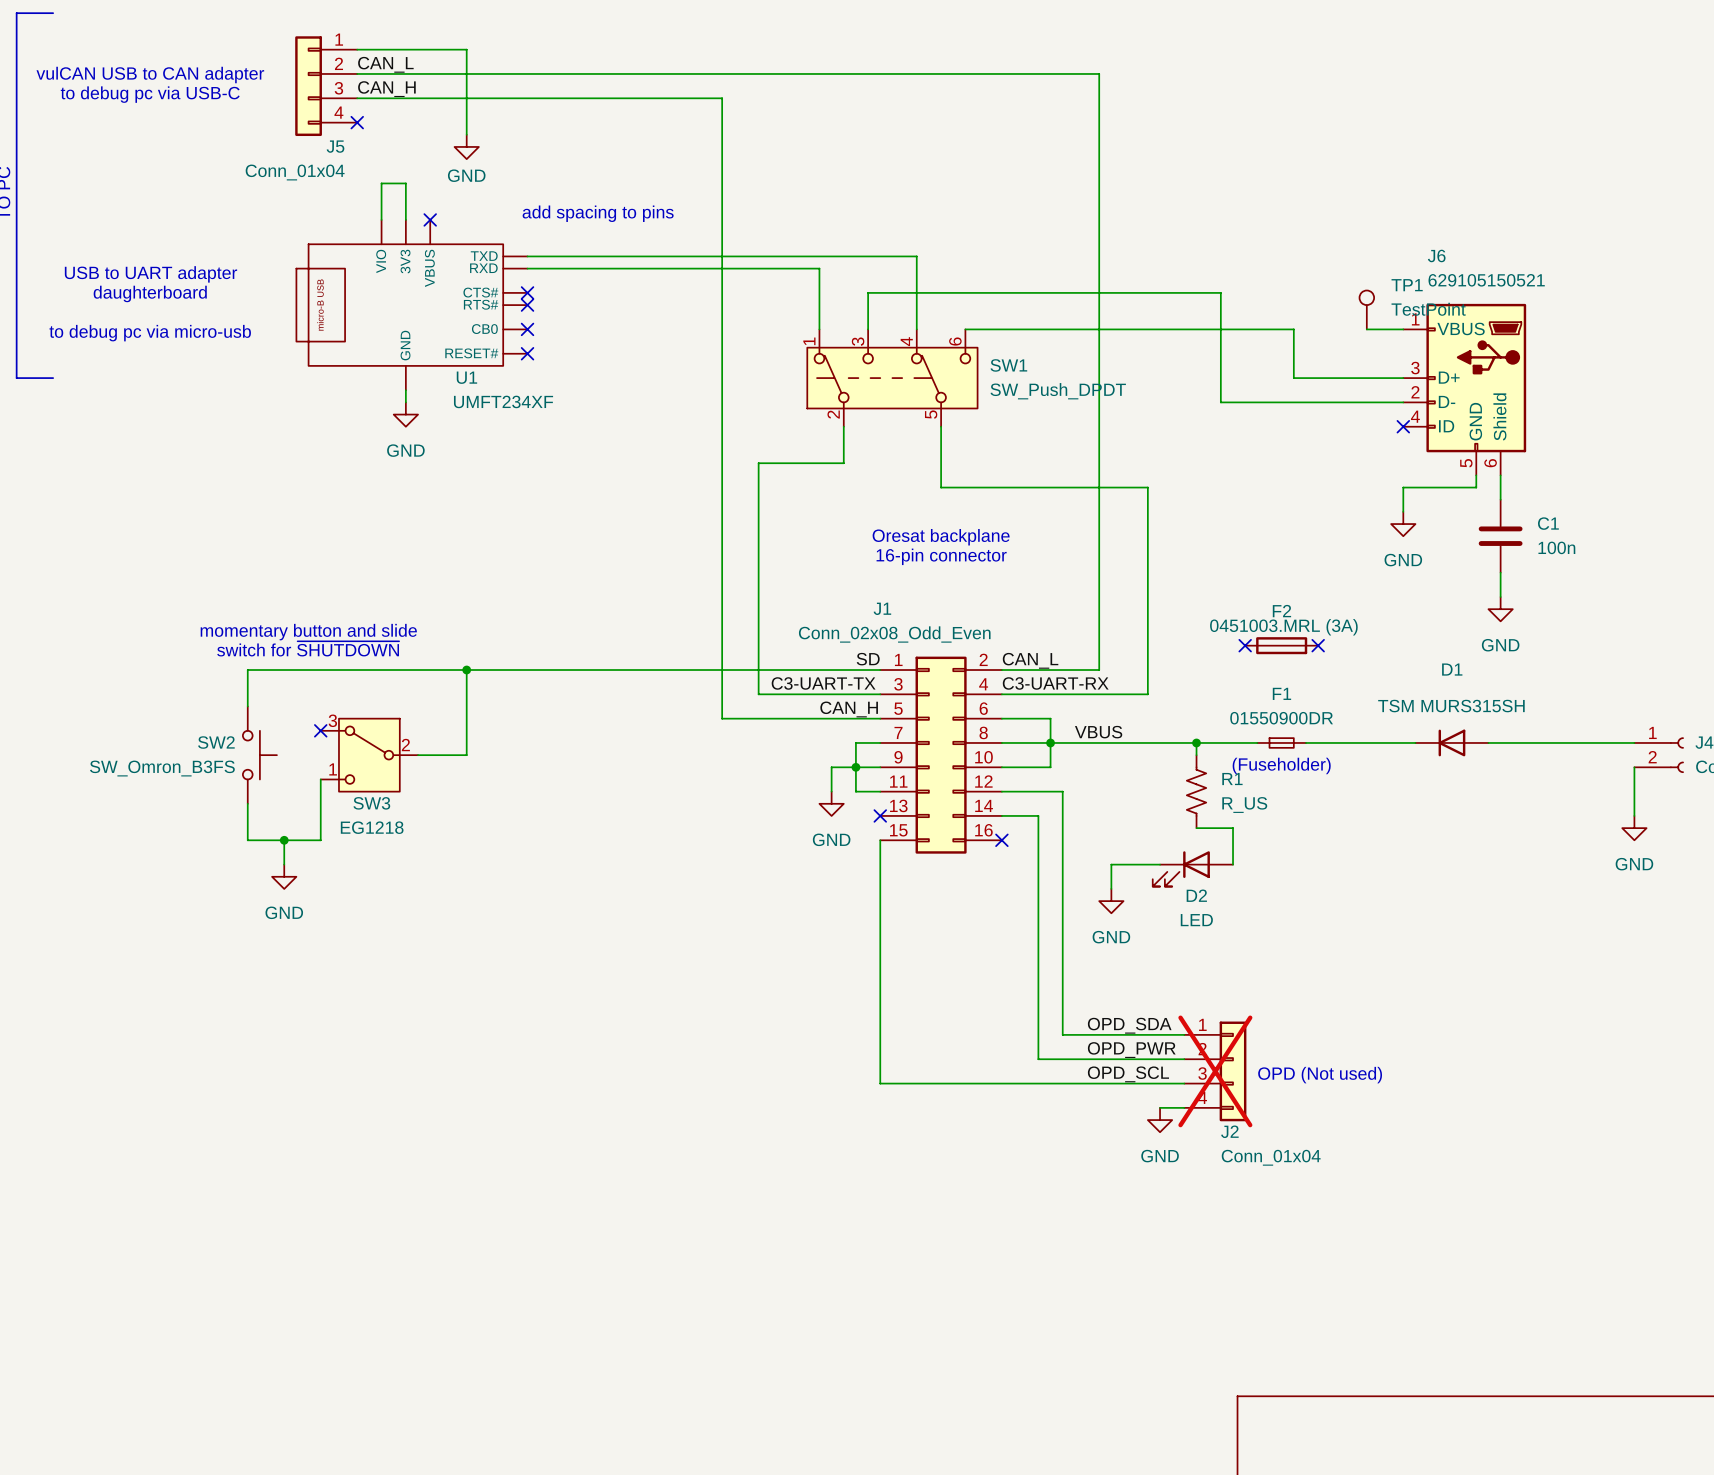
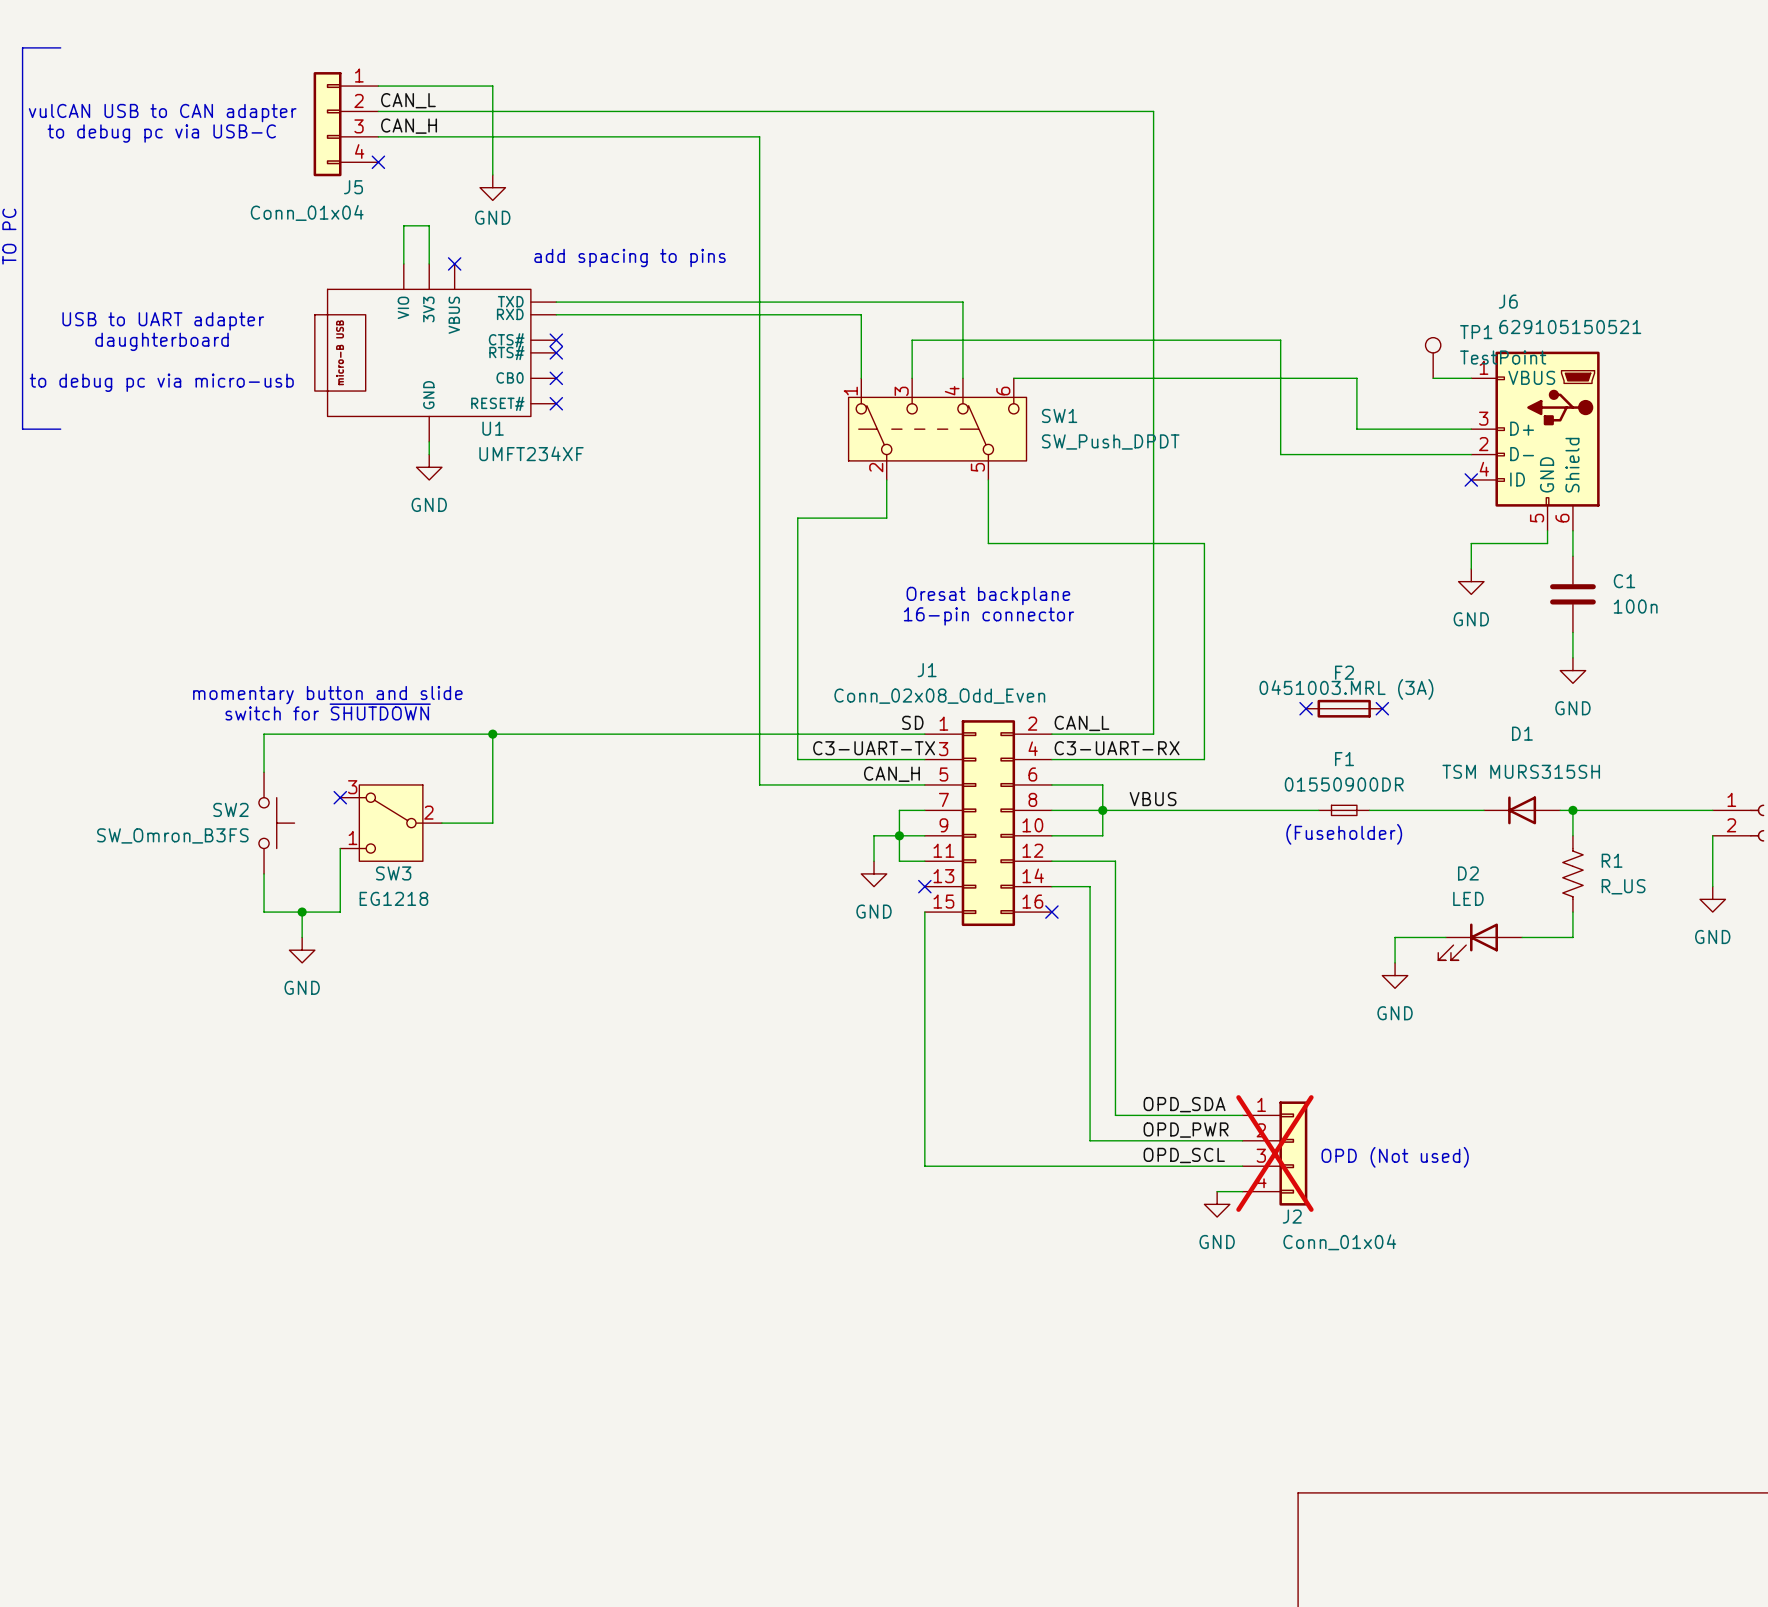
wire: (1196, 742) (1196, 755) -> none
junction: (1196, 742) -> none
wire: none -> (1572, 810) (1572, 835)
junction: none -> (1572, 810)
R1 position: (1196, 791) -> (1572, 873)
wire: (1196, 828) (1233, 828) (1233, 864) -> none
wire: none -> (1572, 912) (1572, 937) (1522, 937)
wire: (1160, 864) (1111, 864) (1111, 888) -> (1445, 937) (1395, 937) (1395, 962)
D2 position: (1192, 868) -> (1480, 941)
D2 name position: D2 (1196, 895) -> D2 (1468, 873)
power symbol position: GND (1111, 901) -> GND (1395, 975)
D2 value position: LED (1196, 920) -> LED (1468, 898)

